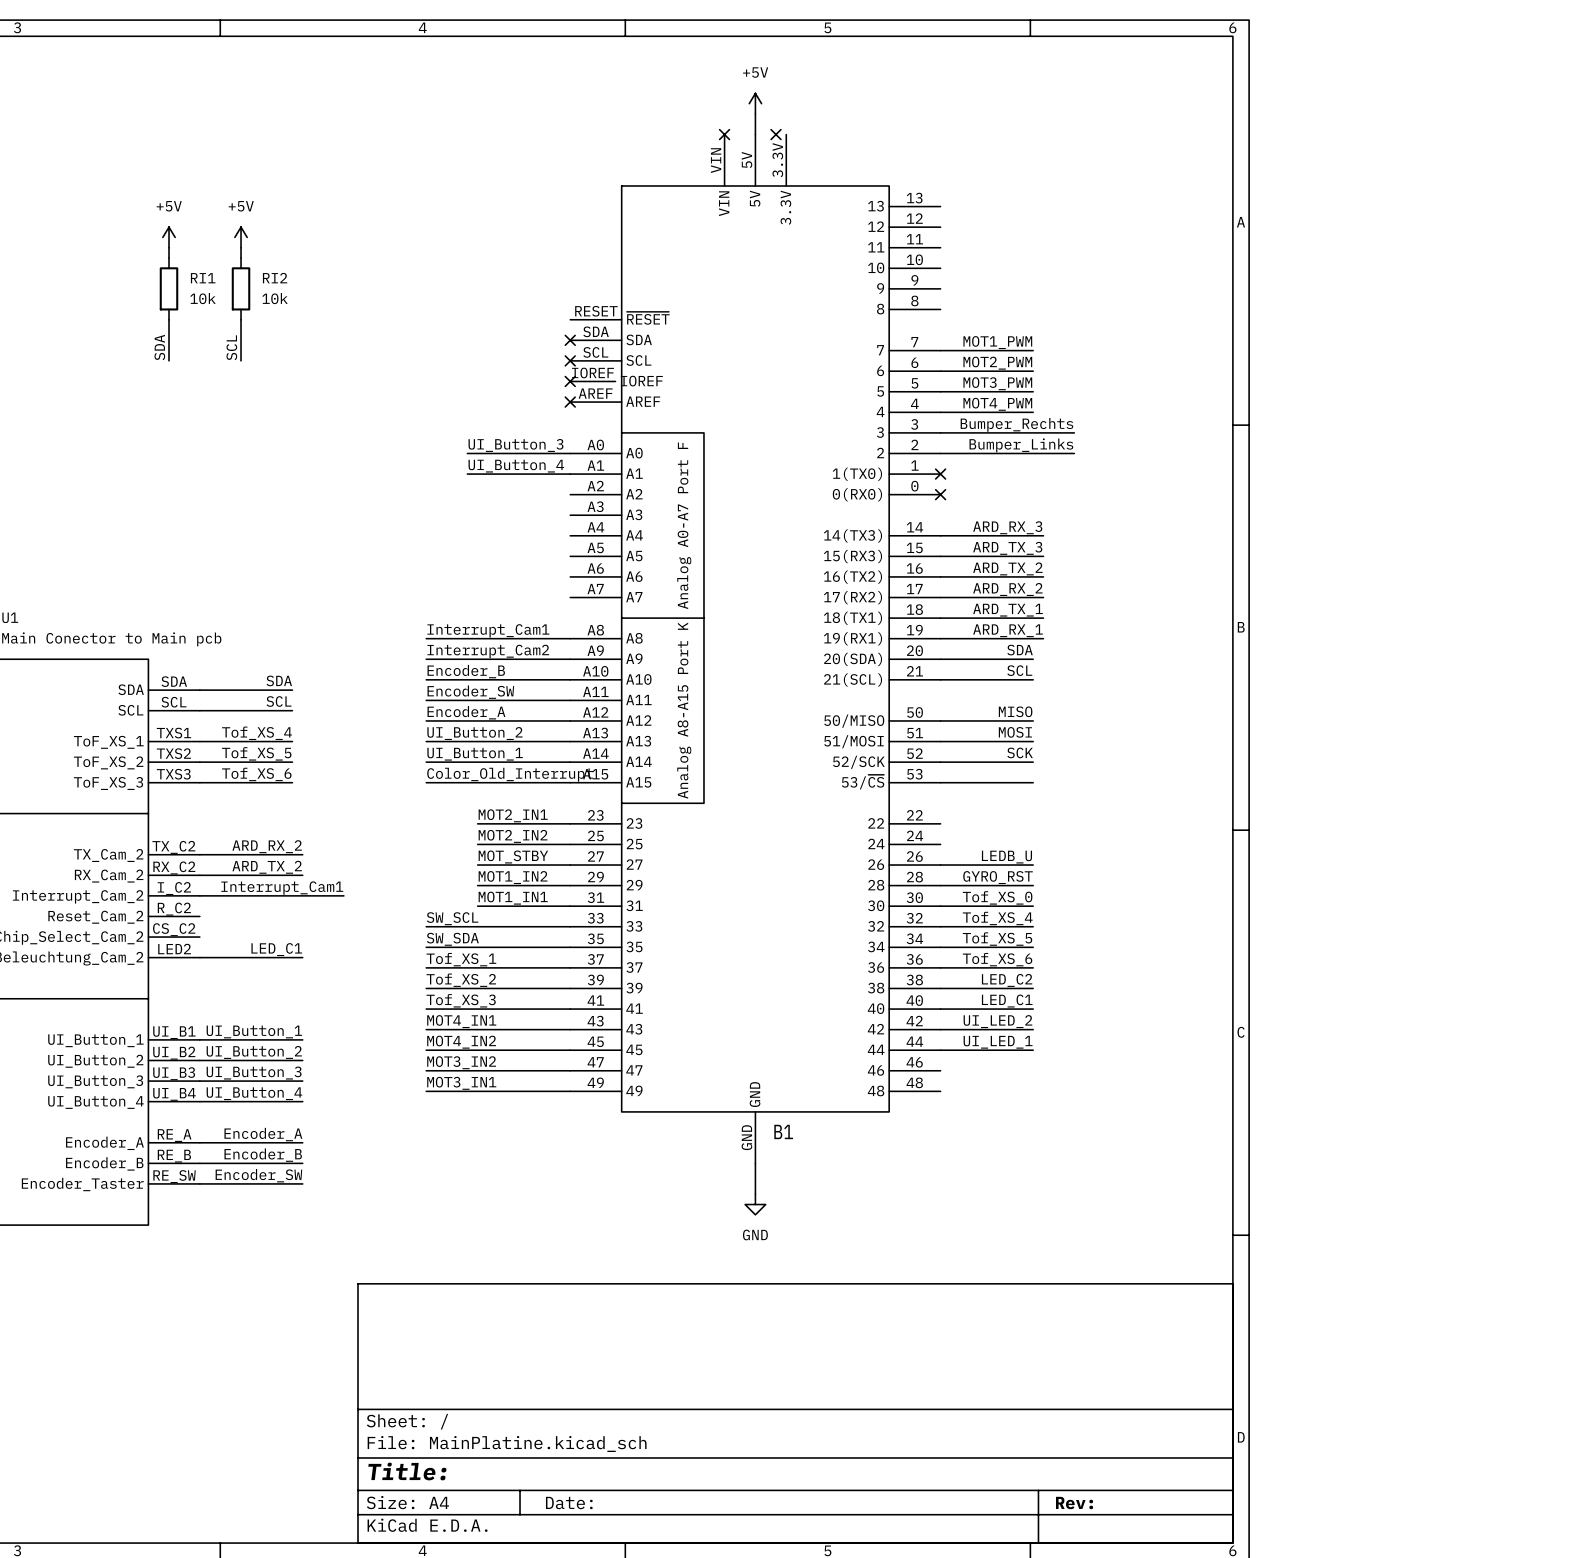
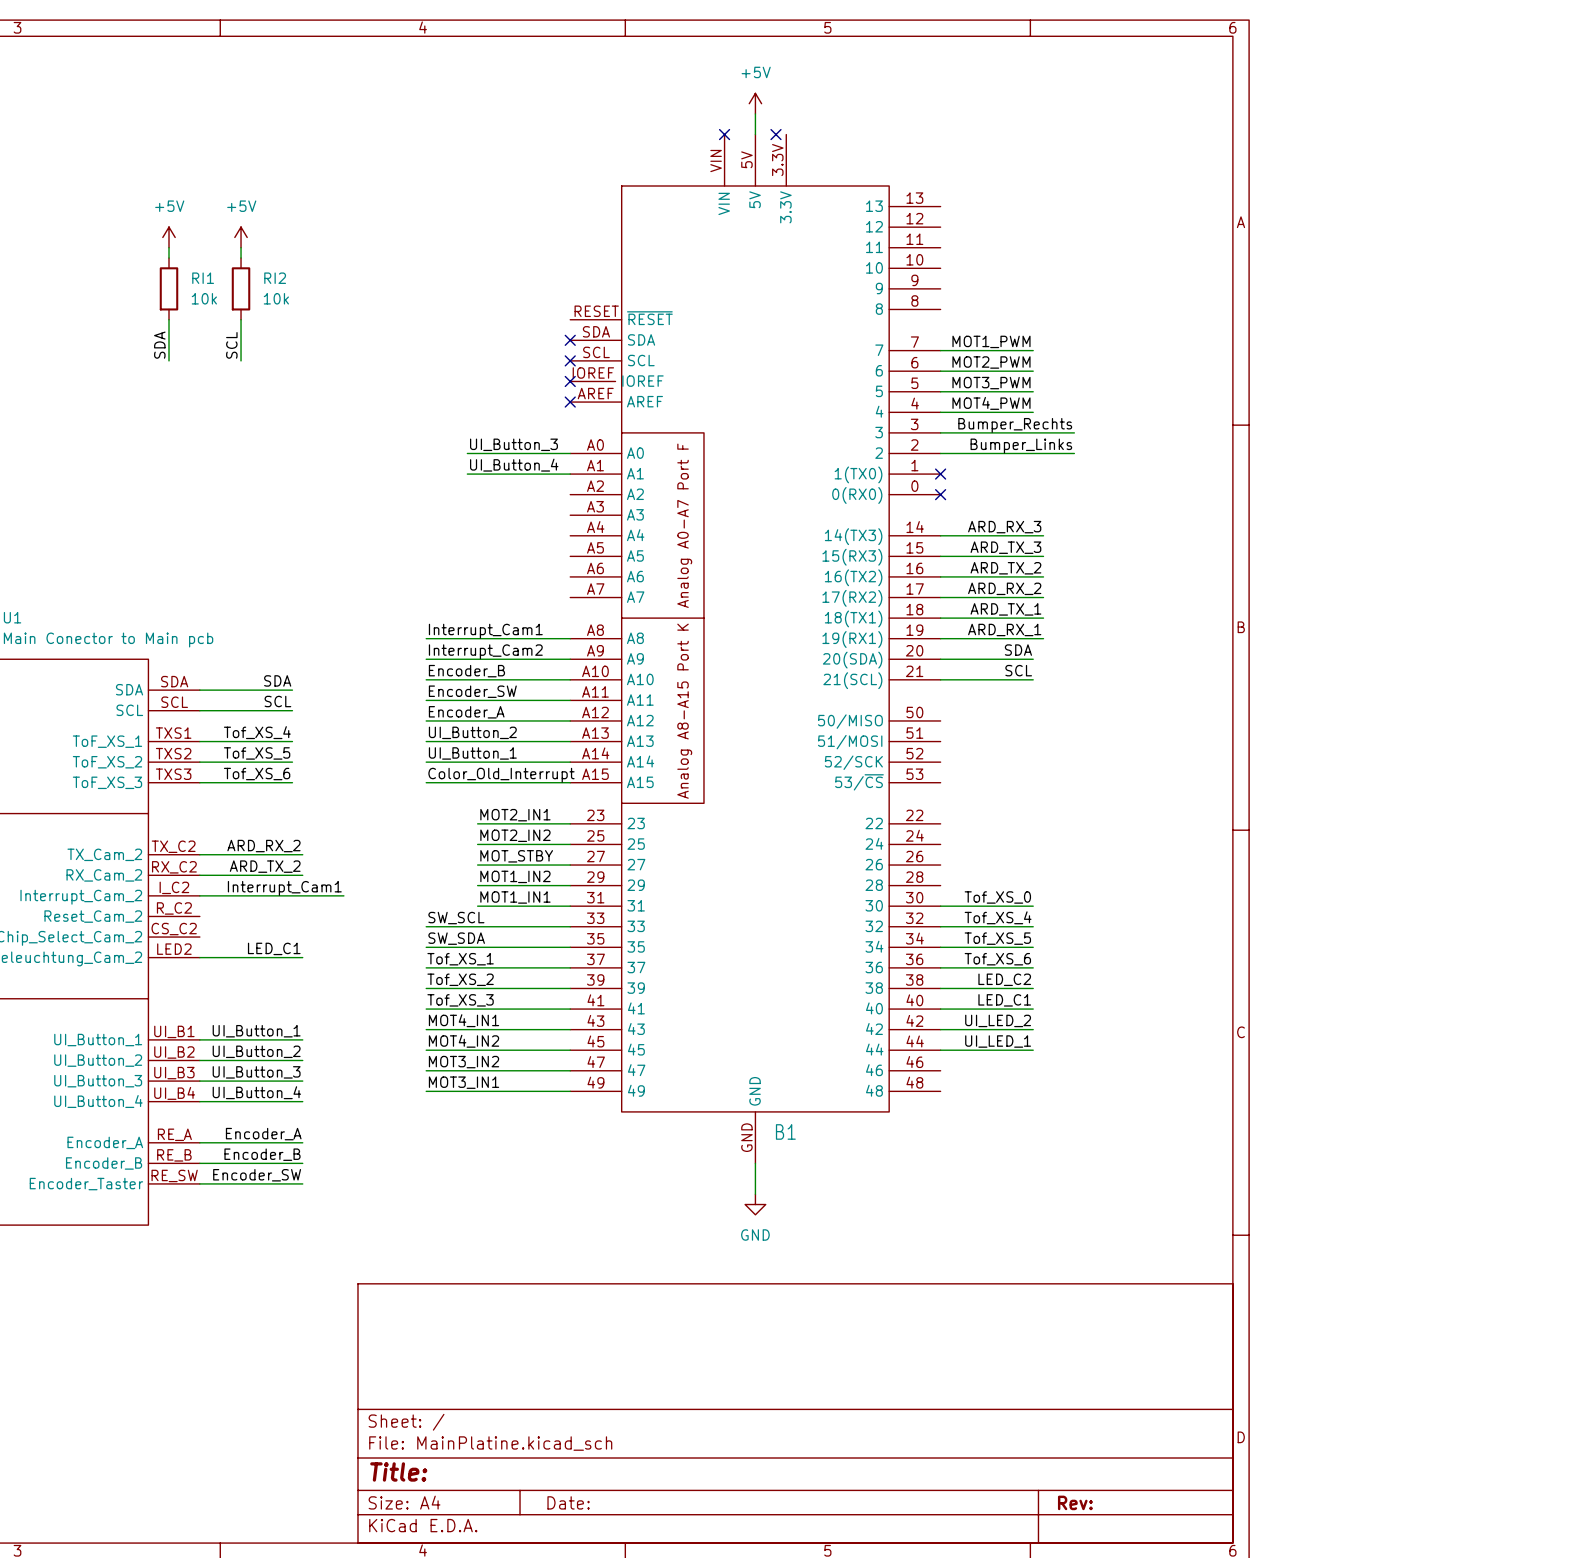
label: MISO (1015, 711) -> none
wire: (940, 720) (1033, 720) -> none
label: MOSI (1015, 732) -> none
wire: (940, 741) (1033, 741) -> none
label: SCK (1020, 752) -> none
wire: (940, 762) (1033, 762) -> none
wire: (940, 782) (1033, 782) -> none
label: LEDB_U (1006, 857) -> none
wire: (940, 865) (1033, 865) -> none
label: GYRO_RST (998, 877) -> none
wire: (940, 885) (1033, 885) -> none

